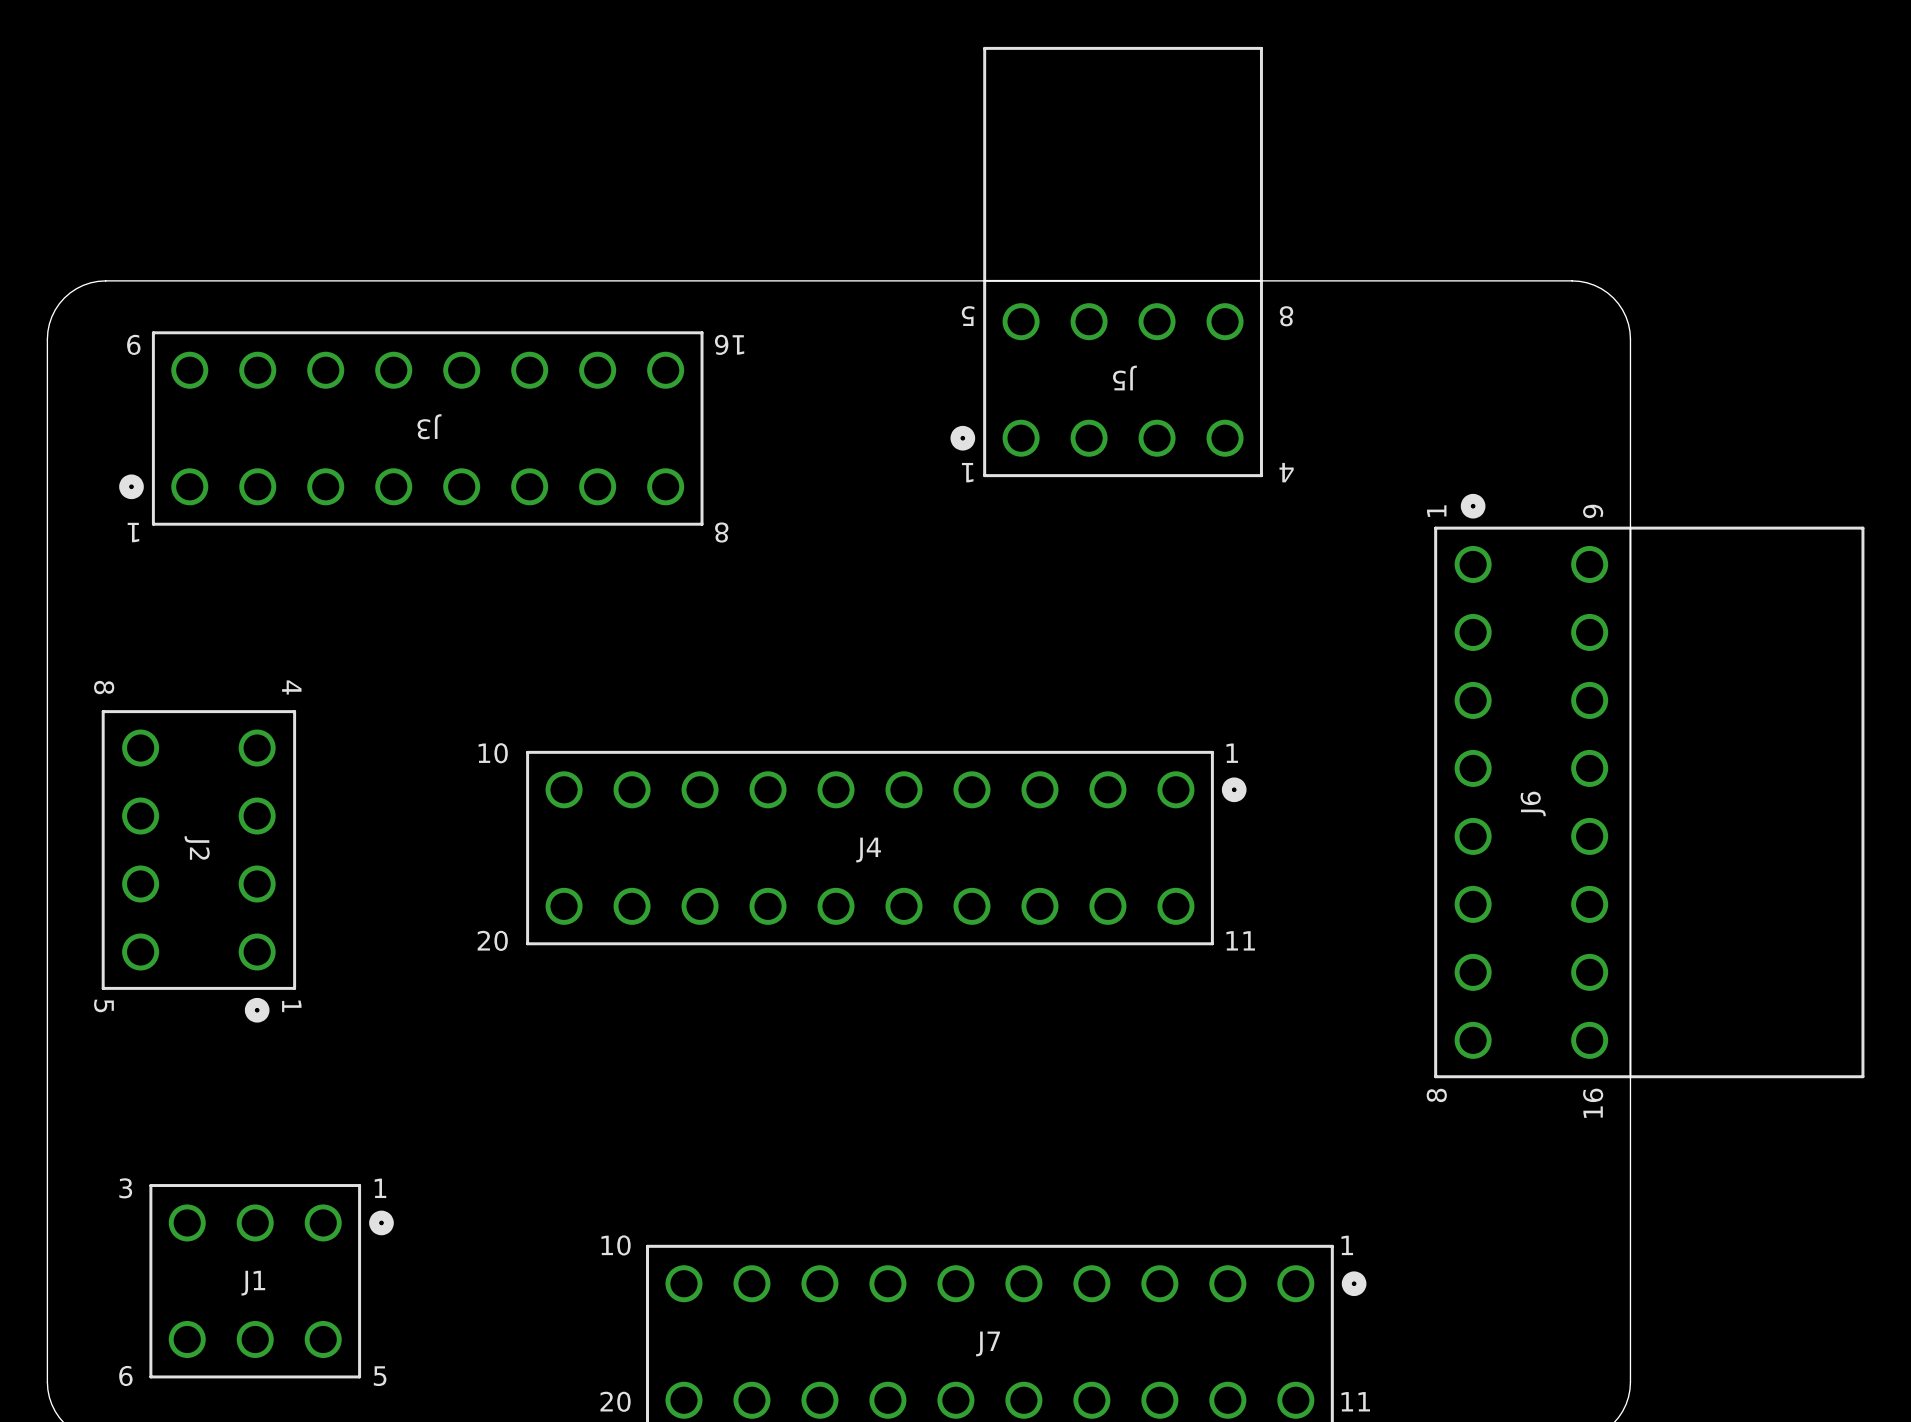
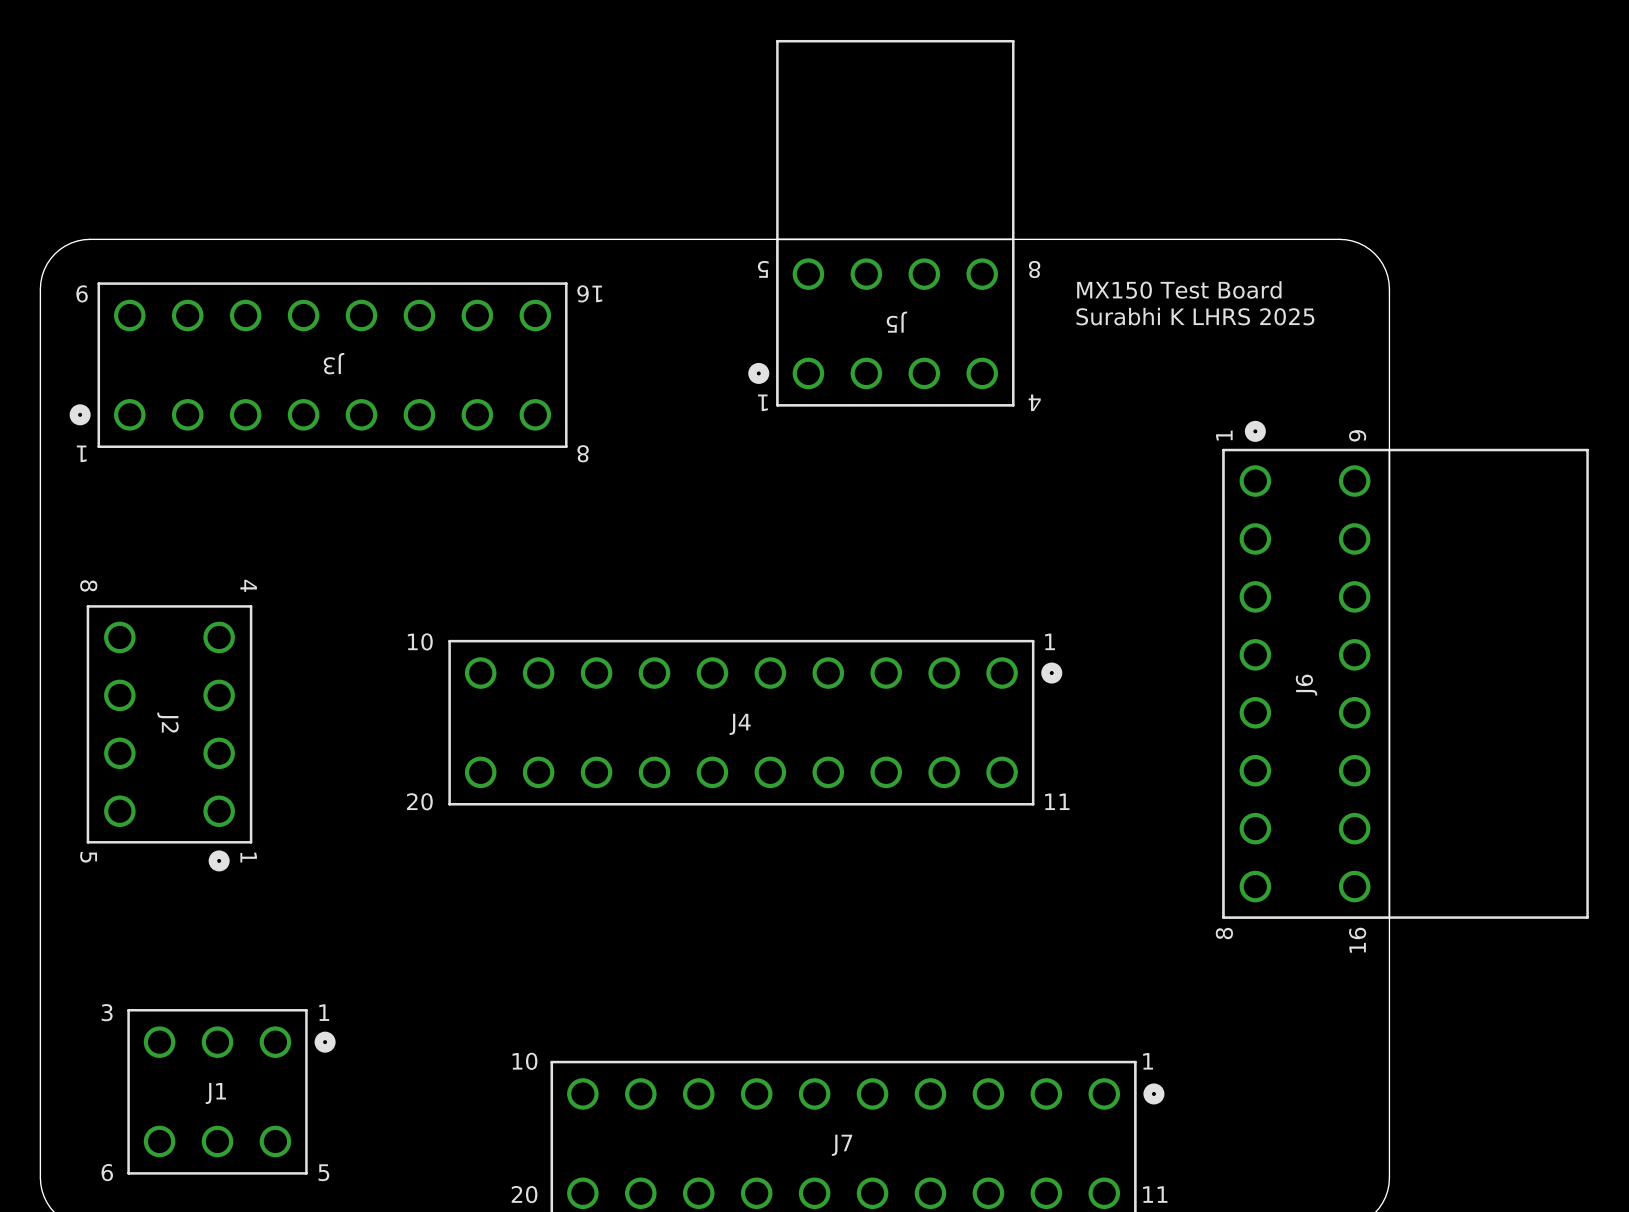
J5 position: (1106, 262) -> (881, 223)
text: none -> MX150 Test Board (1179, 289)
text: none -> Surabhi K LHRS 2025 (1195, 316)
J3 position: (411, 428) -> (318, 365)

